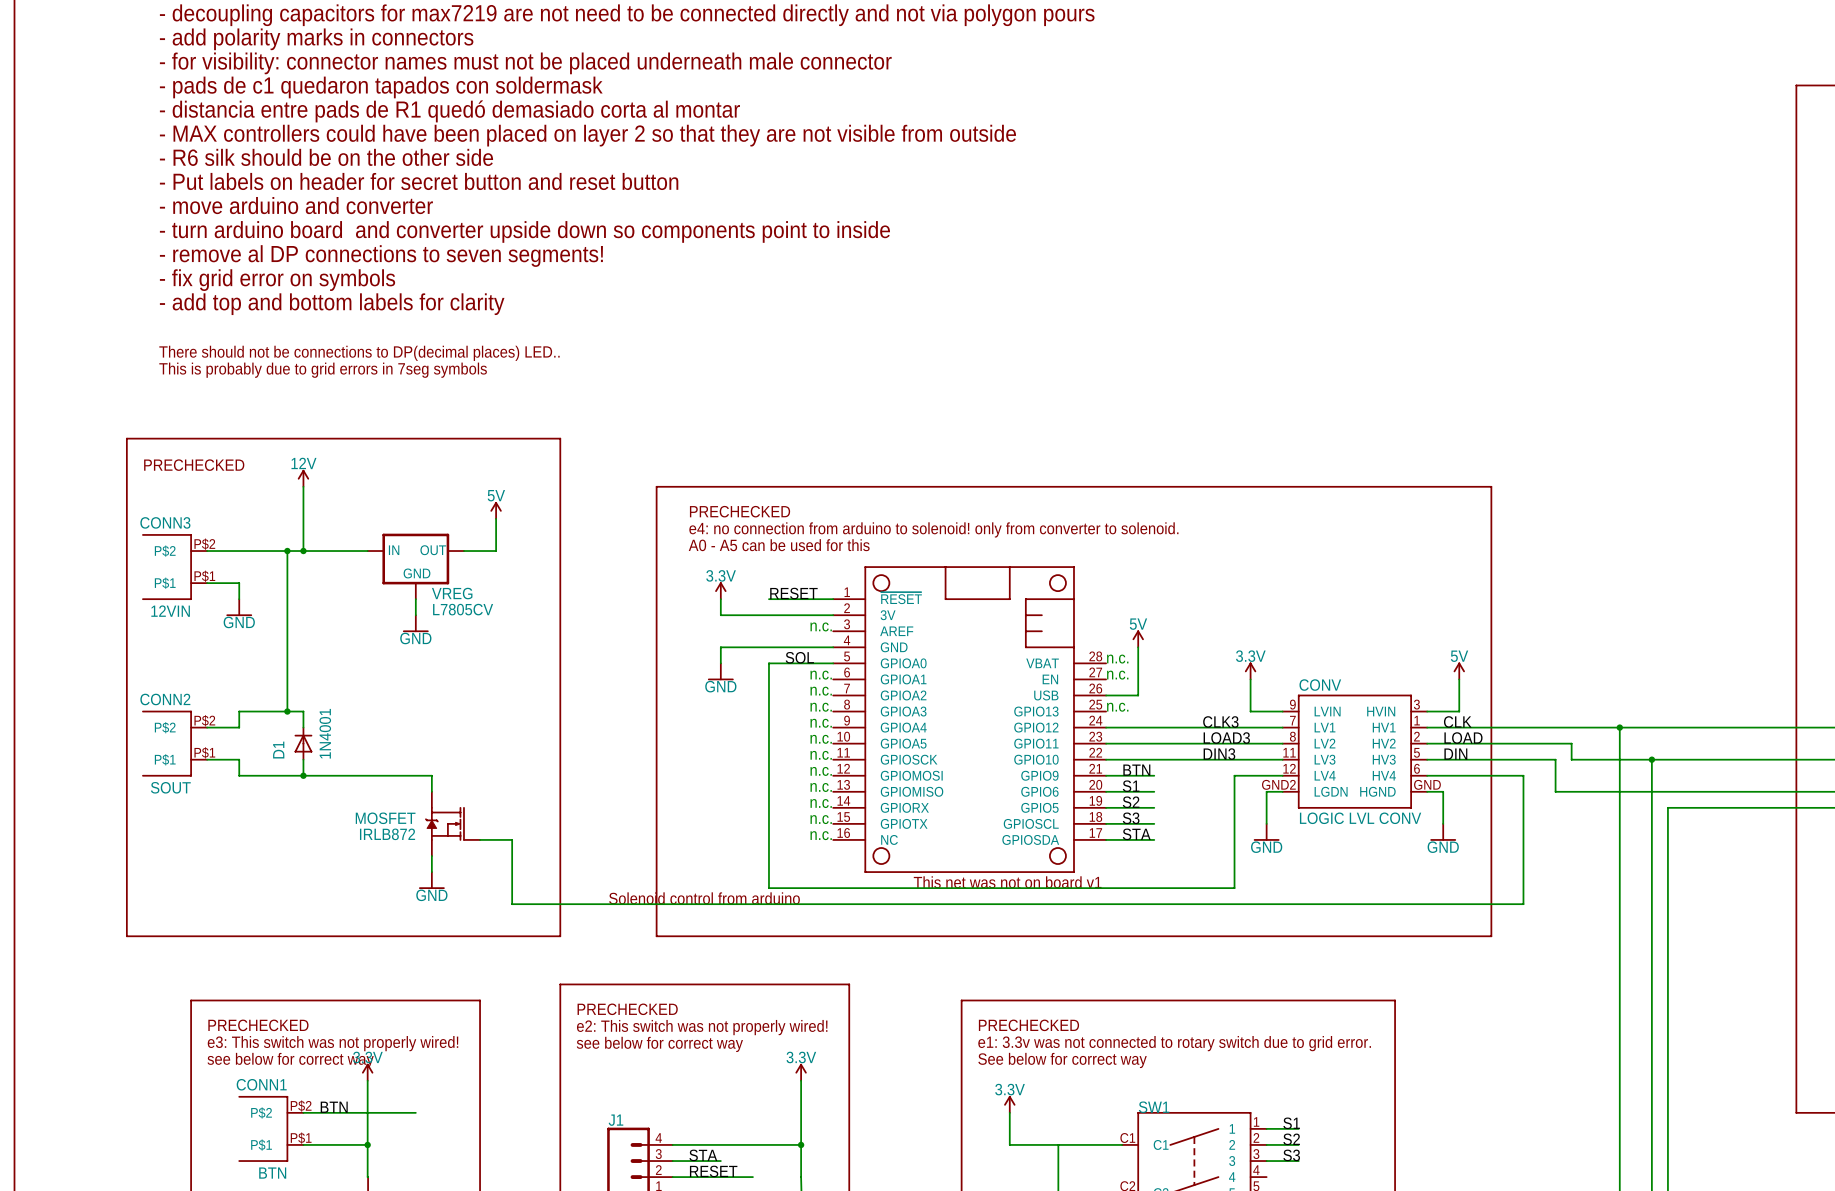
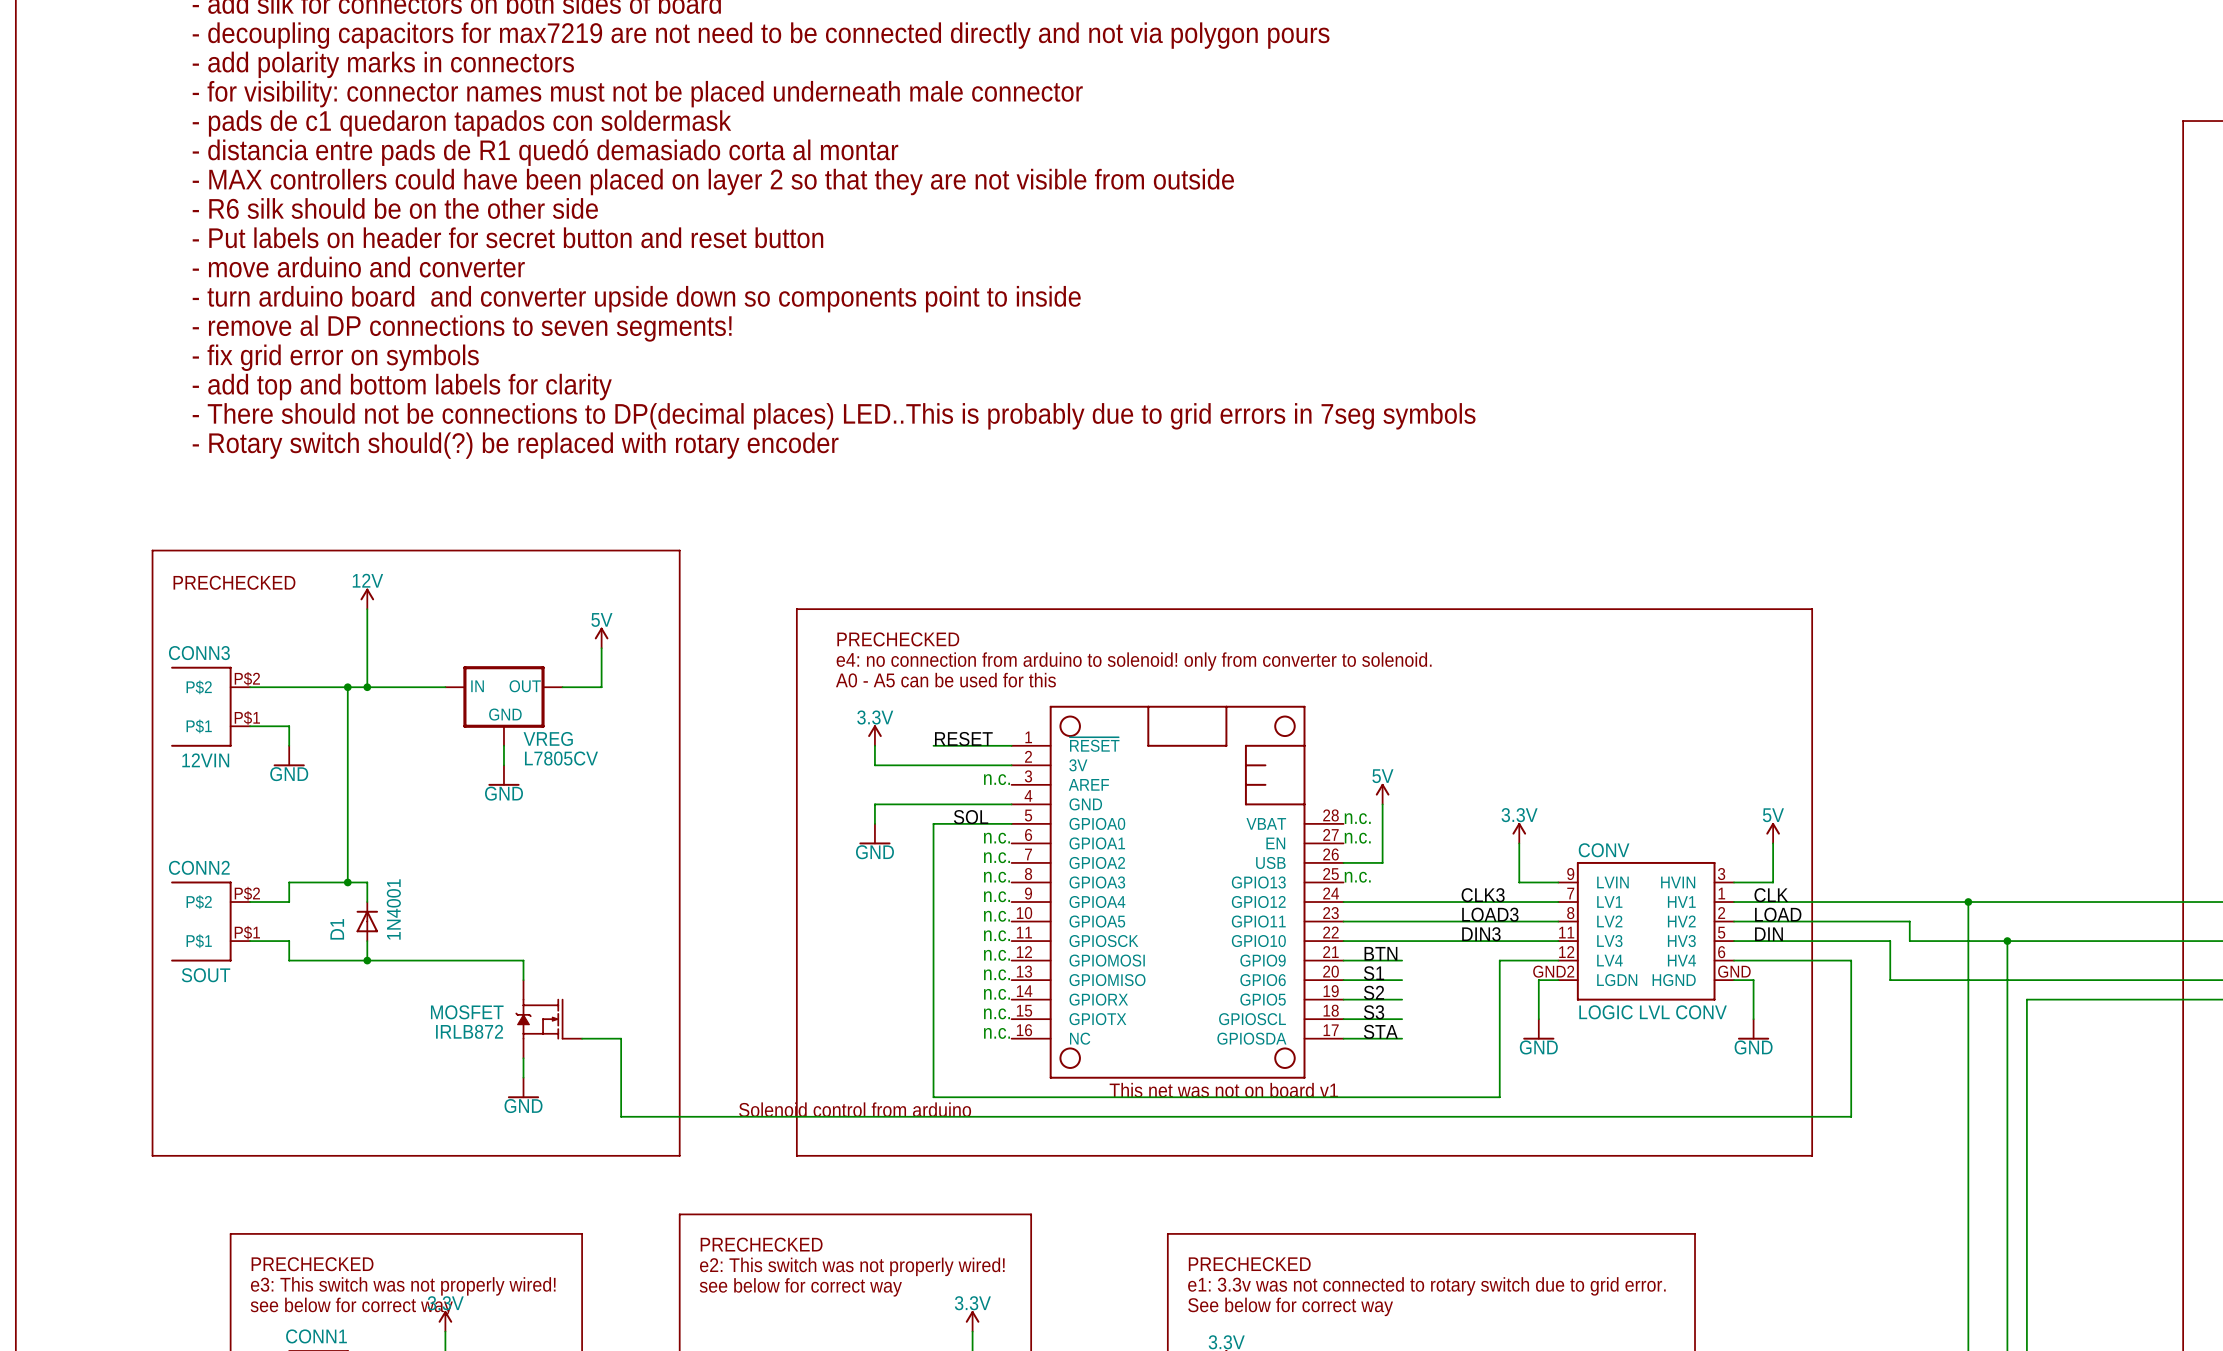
text: none -> - Rotary switch should(?) be replaced with rotary encoder (515, 445)
text: There should not be connections to DP(decimal places) LED.. (359, 353) -> - There should not be connections to DP(decimal places) LED..This is probably due to grid errors in 7seg symbols (834, 416)
text: This is probably due to grid errors in 7seg symbols (323, 370) -> none

